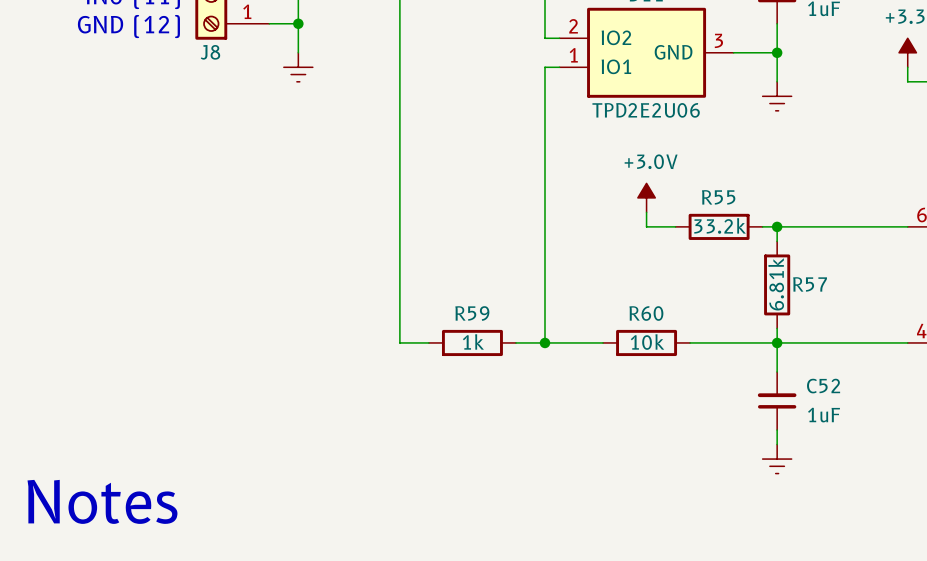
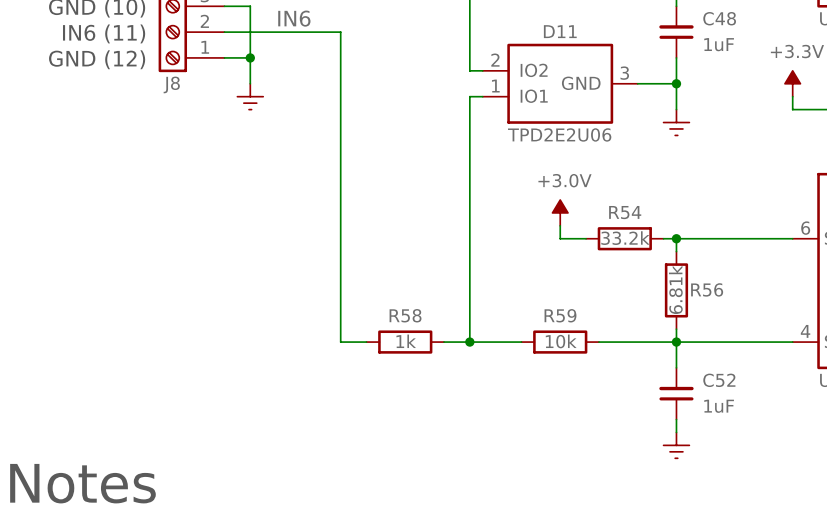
R55 name: R55 (718, 197) -> R54 (625, 212)
R57 name: R57 (810, 284) -> R56 (707, 289)
R59 name: R59 (472, 313) -> R58 (405, 315)
R60 name: R60 (646, 313) -> R59 (560, 315)

